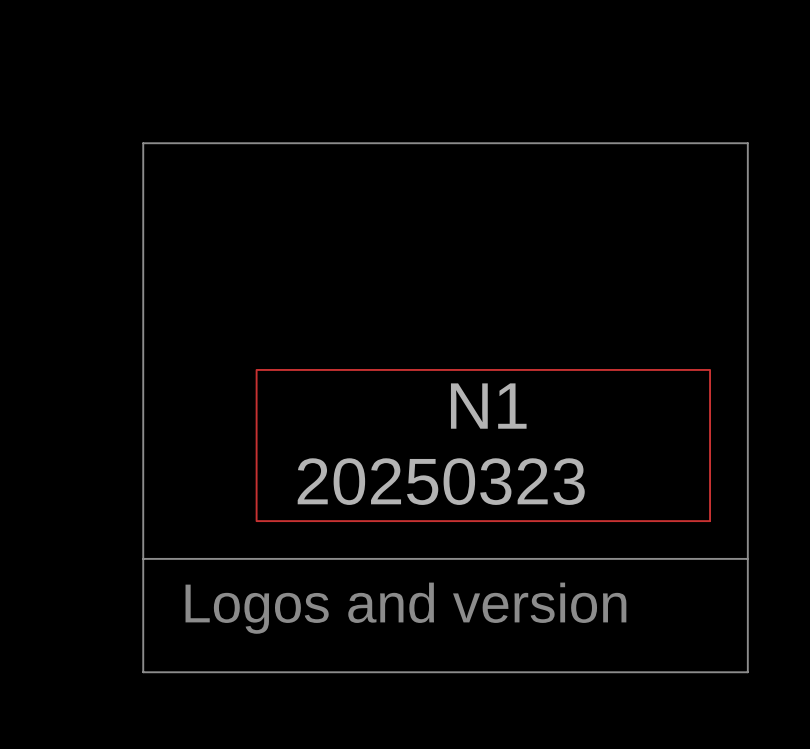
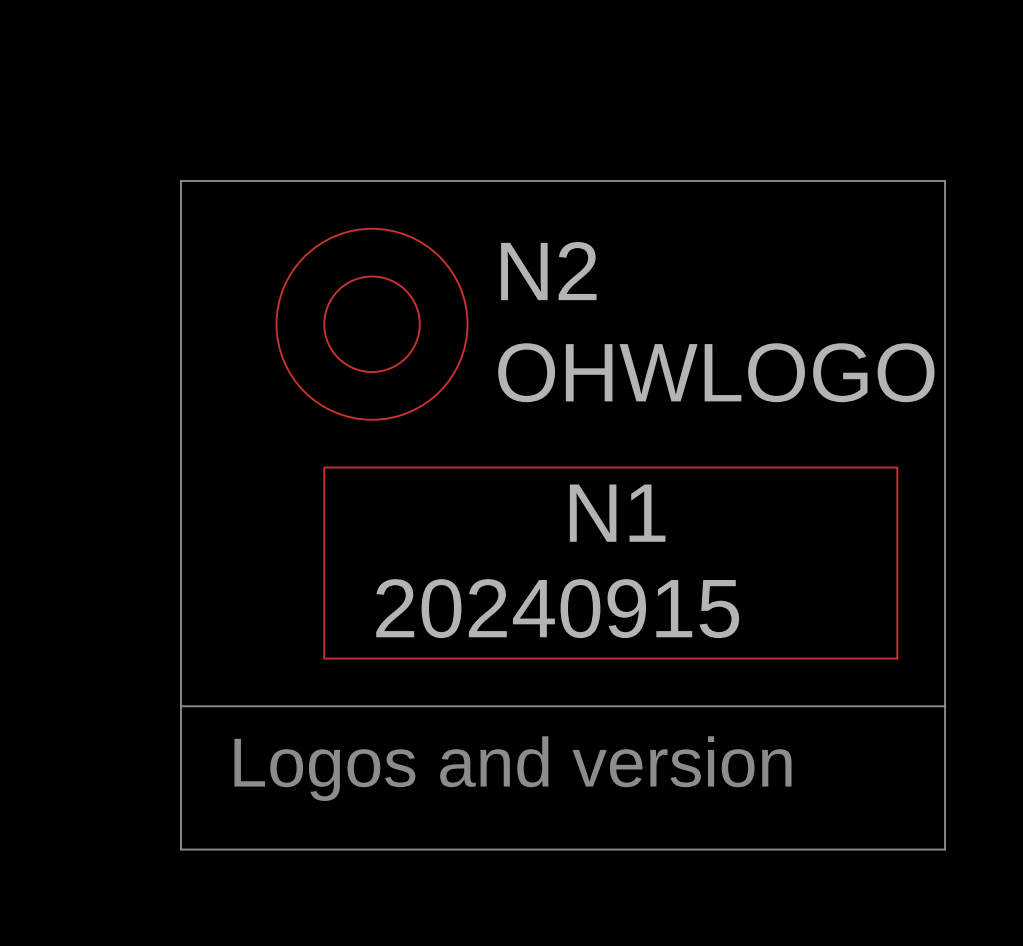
N2: none -> OHWLOGO (372, 324)
N1 value: 20250323 (441, 481) -> 20240915 (557, 608)

